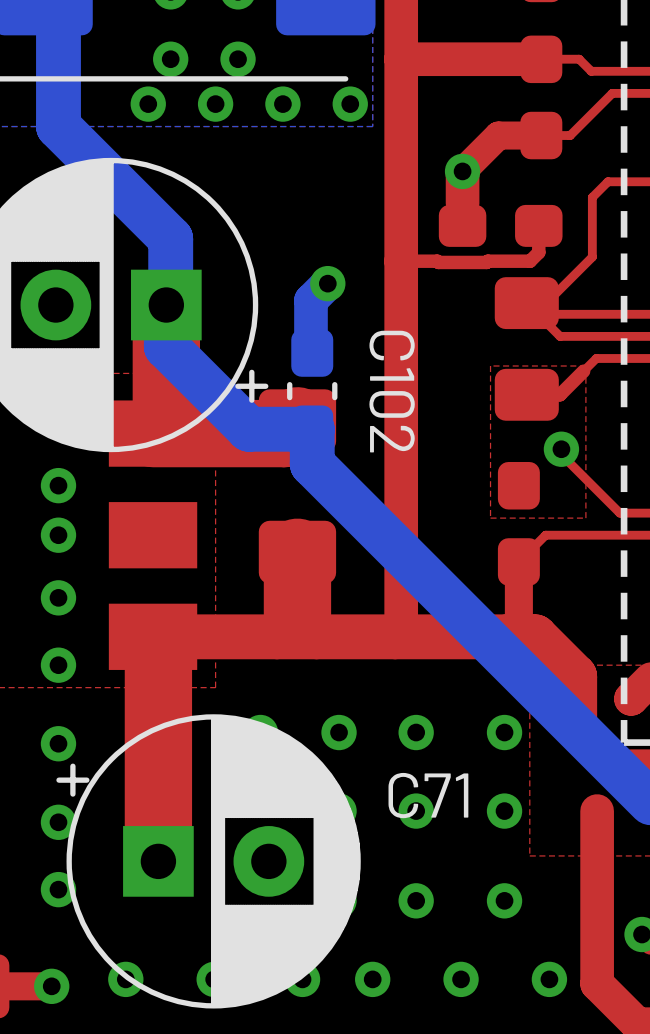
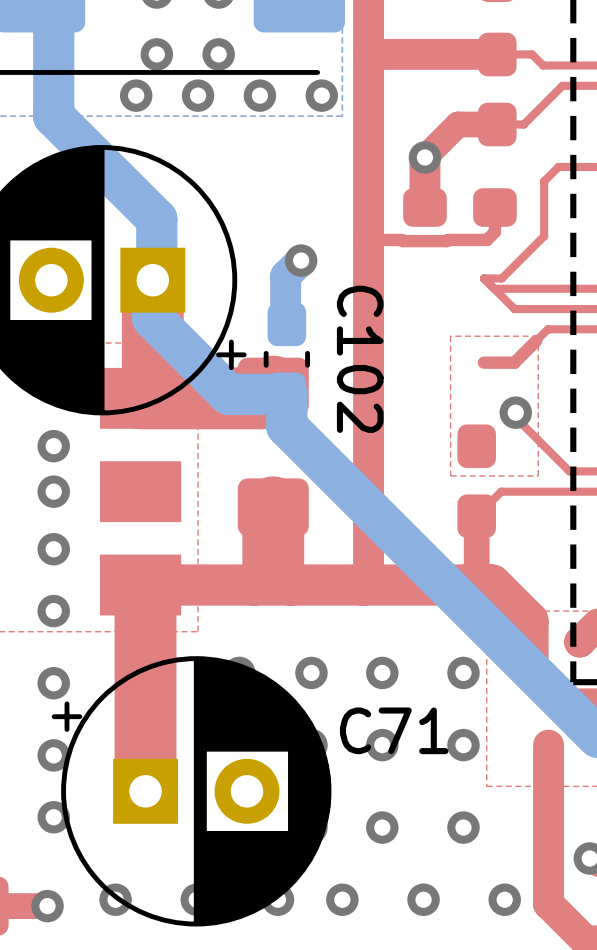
part: (526, 348) -> none

